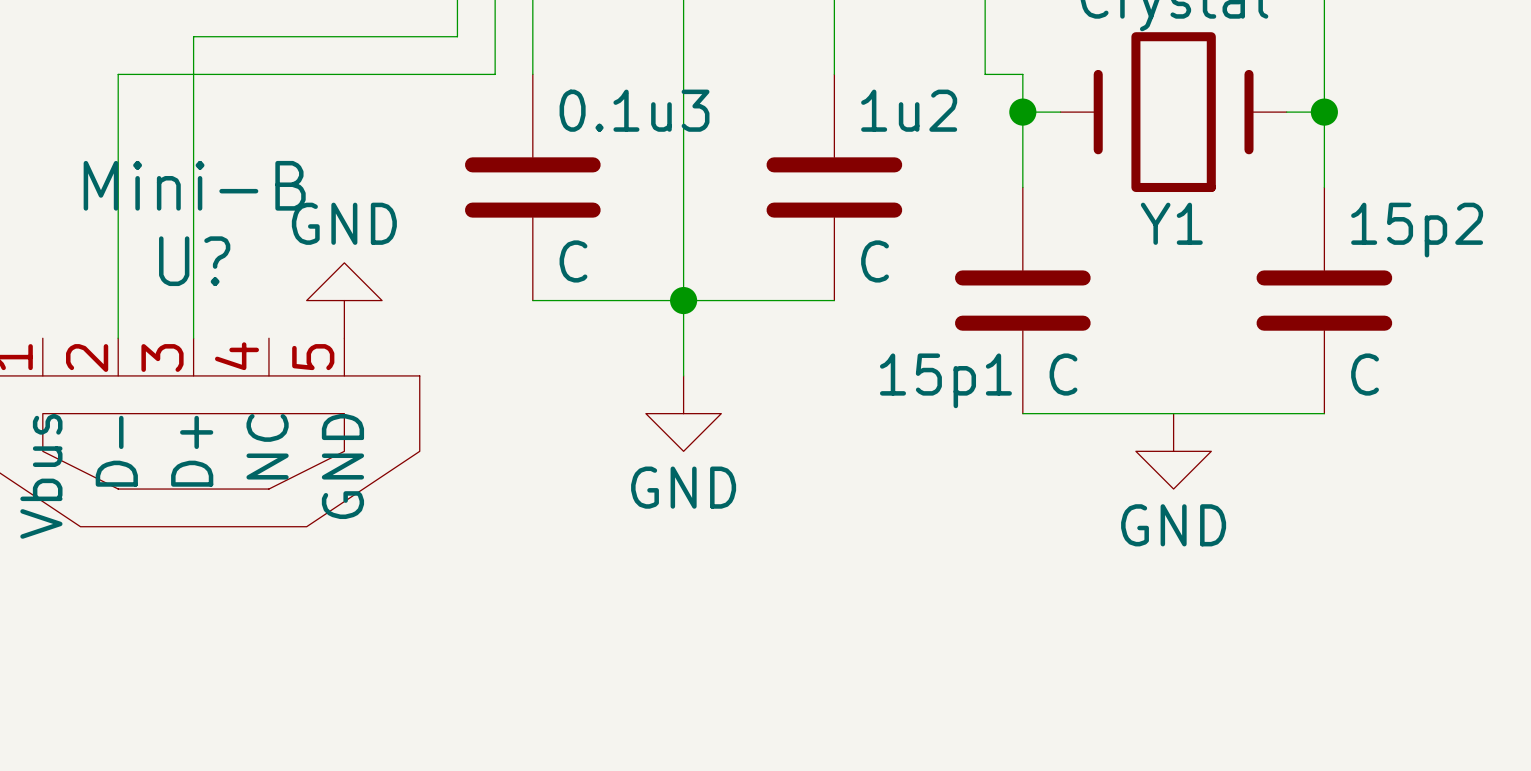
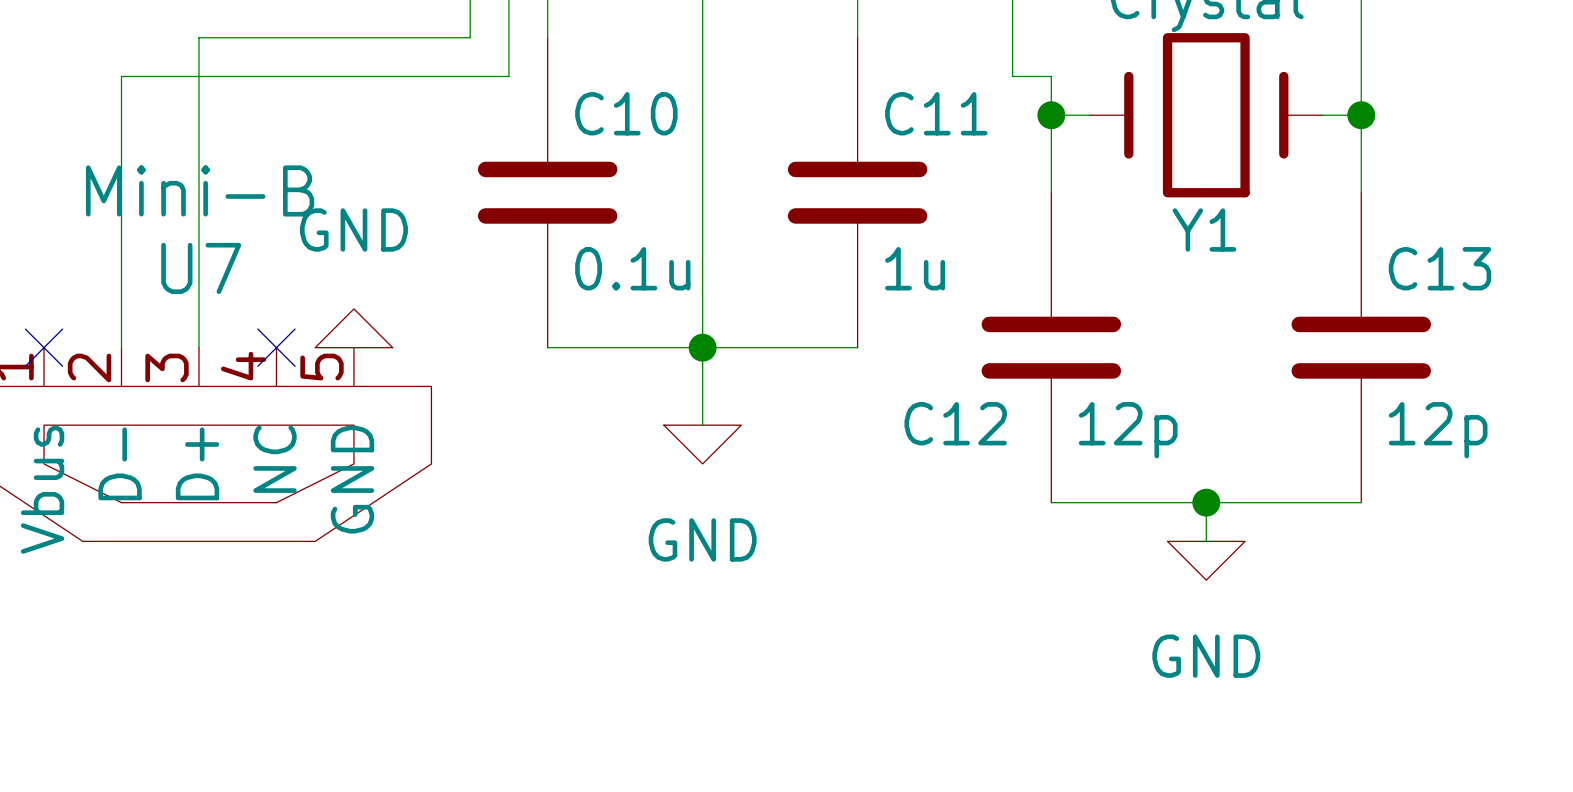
0.1u3: C (532, 187) -> none
C10: none -> 0.1u (547, 192)
1u2: C (834, 187) -> none
C11: none -> 1u (857, 192)
U? name: U? (194, 261) -> U7 (201, 268)
power symbol shape: [306, 262, 383, 339] -> [315, 308, 393, 348]
wire: (532, 300) (834, 300) -> (547, 347) (857, 347)
junction position: (683, 300) -> (702, 347)
15p1: C (1022, 300) -> none
15p2: C (1324, 300) -> none
no-connect mark: none -> (44, 347)
no-connect mark: none -> (276, 347)
C12: none -> 12p (1051, 347)
C13: none -> 12p (1361, 347)
power symbol shape: [645, 375, 722, 452] -> [663, 425, 742, 464]
wire: (1022, 413) (1324, 413) -> (1051, 502) (1361, 502)
power symbol: GND (1173, 451) -> none
wire: none -> (1206, 502) (1206, 541)
junction: none -> (1206, 502)
power symbol: none -> GND (1206, 560)

